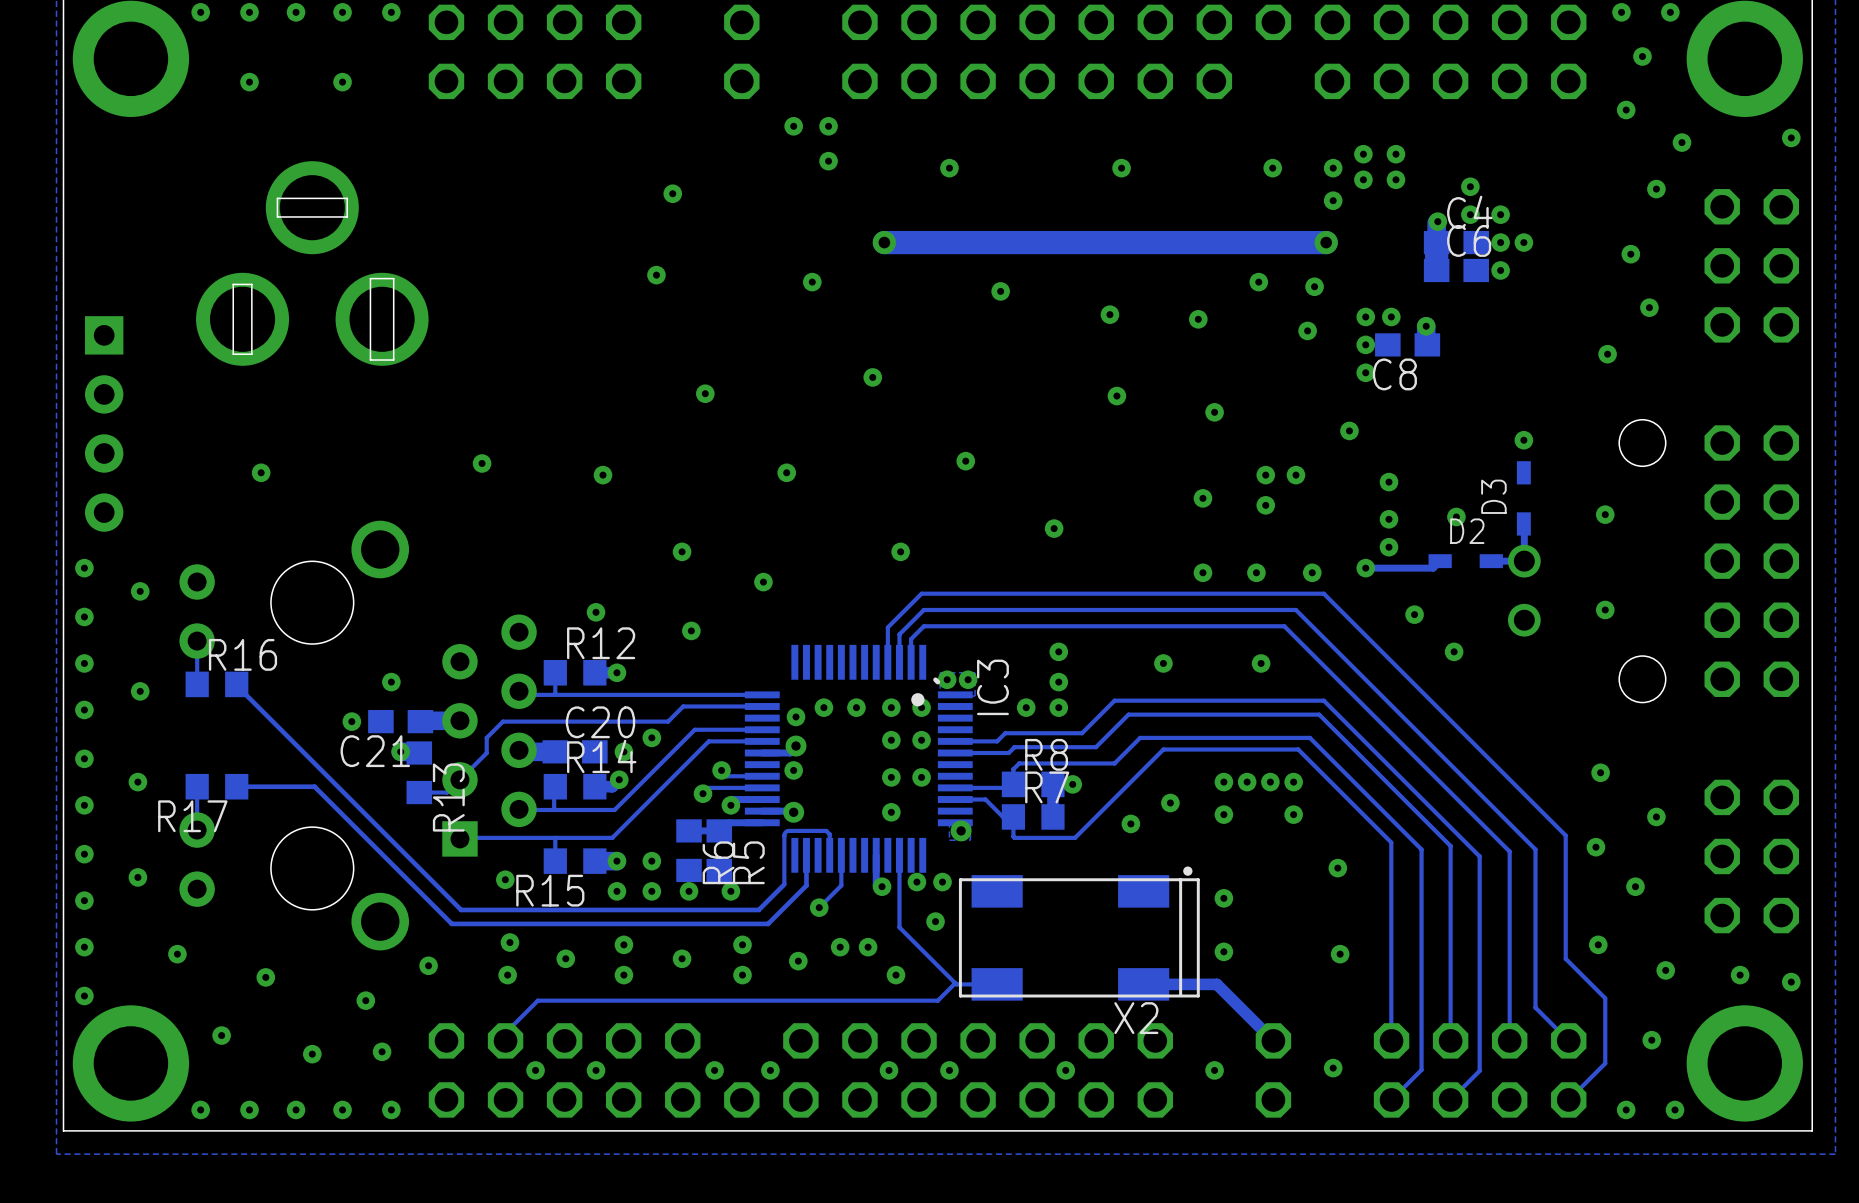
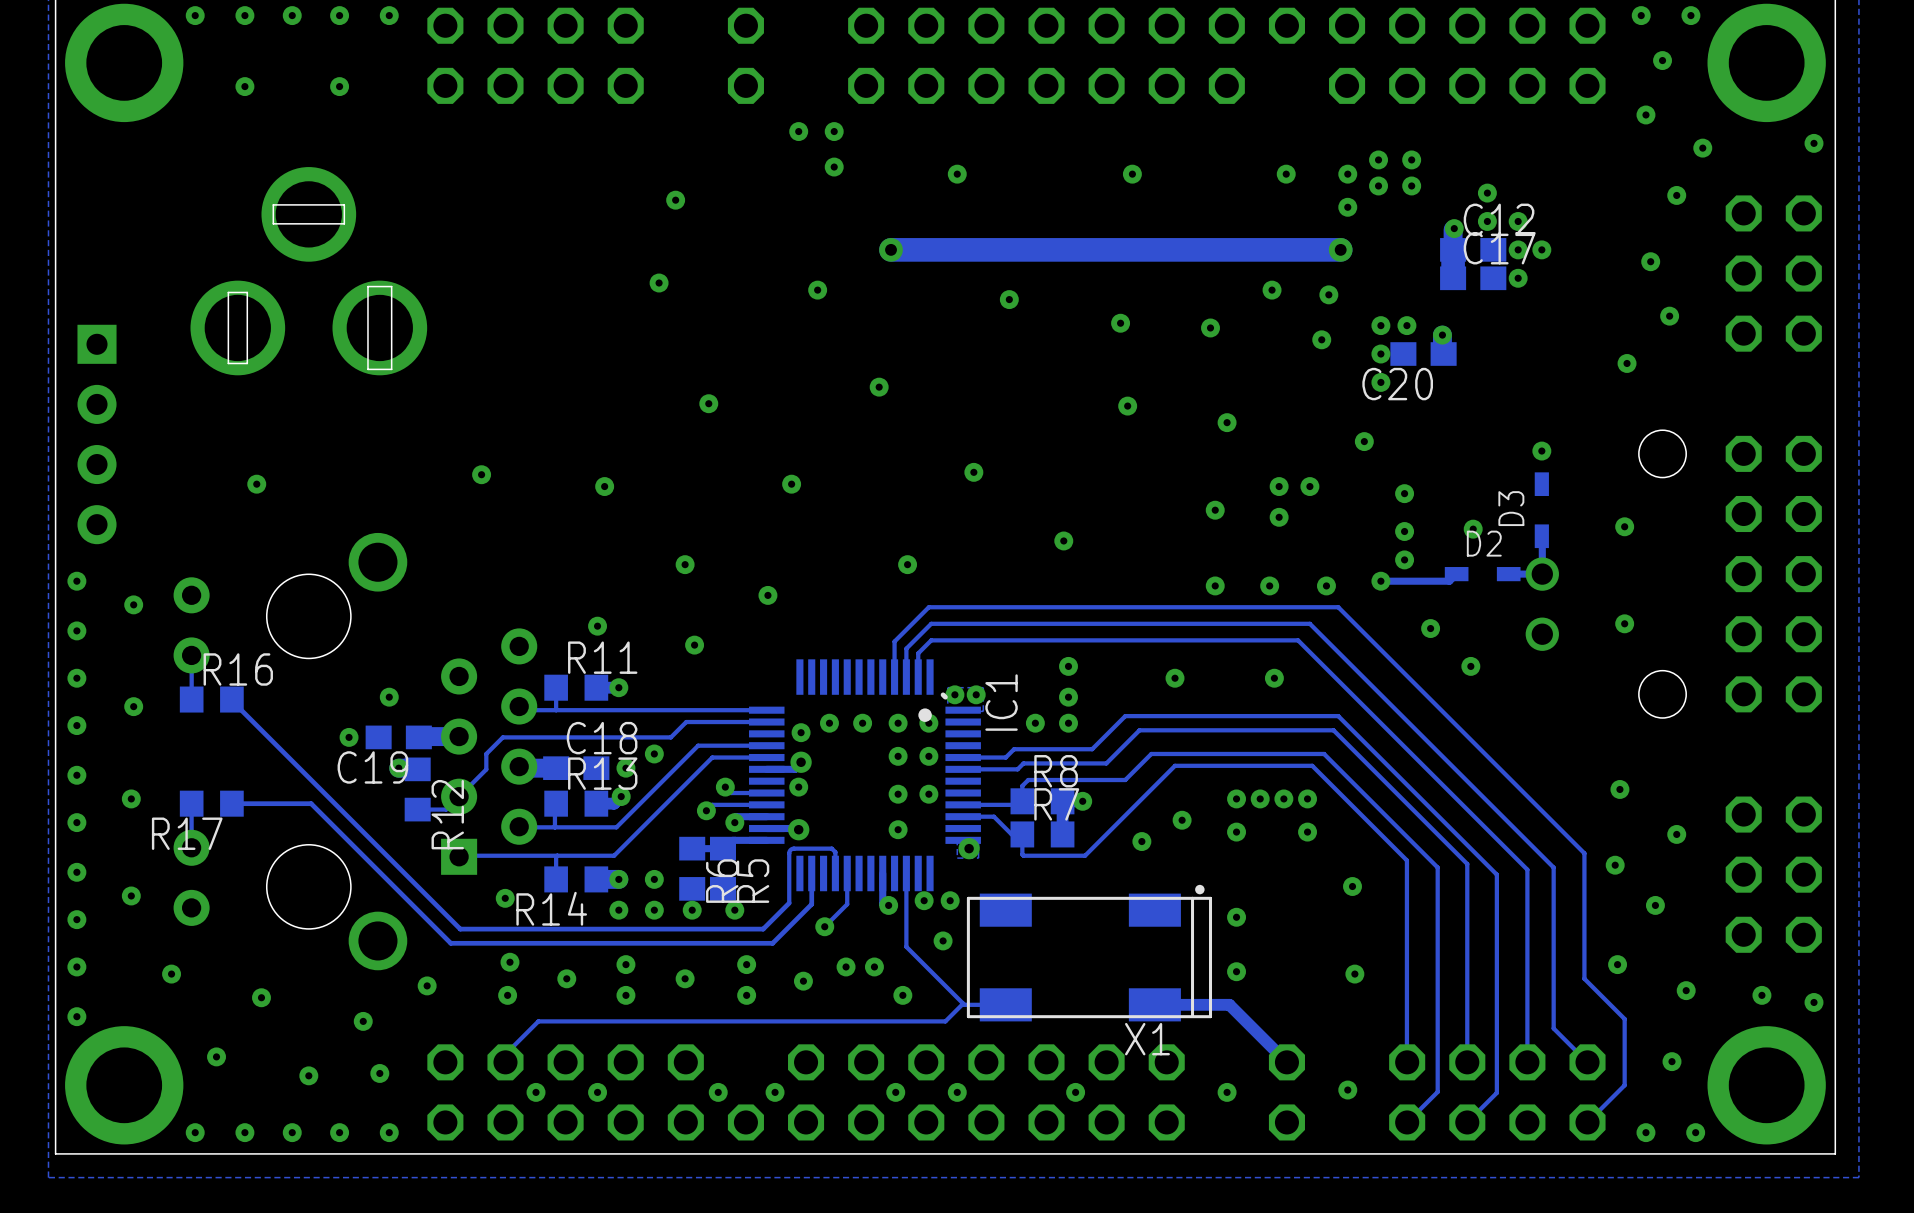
C4 name: C4 (1469, 212) -> C12 (1499, 219)
C6 name: C6 (1469, 240) -> C17 (1499, 248)
C8 name: C8 (1394, 374) -> C20 (1397, 384)
R12 name: R12 (601, 643) -> R11 (602, 657)
IC3 name: IC3 (992, 687) -> IC1 (1001, 702)
C20 name: C20 (600, 722) -> C18 (602, 738)
C21 name: C21 (375, 751) -> C19 (372, 767)
R14 name: R14 (601, 756) -> R13 (602, 773)
R13 name: R13 (448, 797) -> R12 (447, 814)
R15 name: R15 (550, 890) -> R14 (551, 908)
X2 name: X2 (1136, 1018) -> X1 (1147, 1039)

